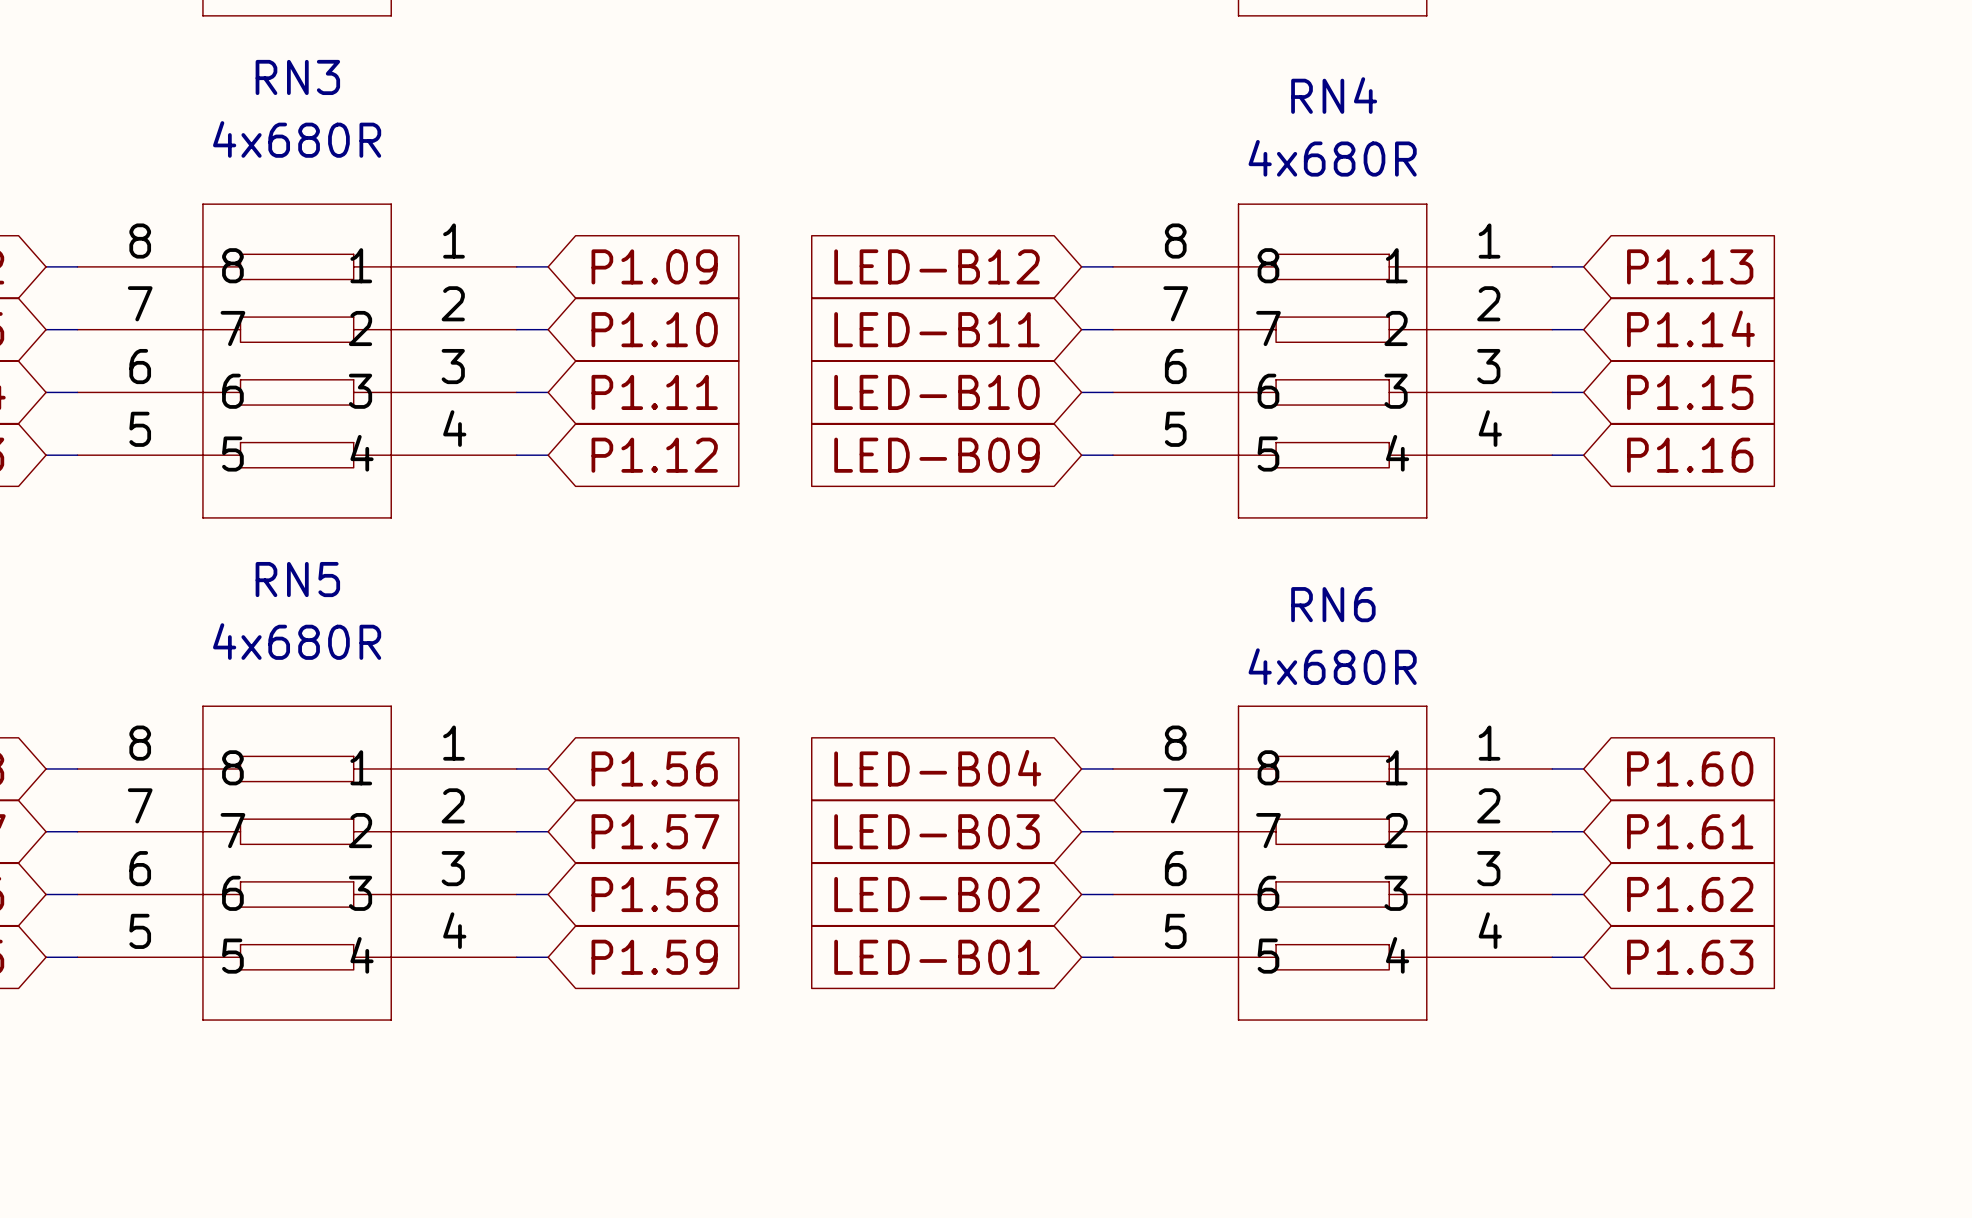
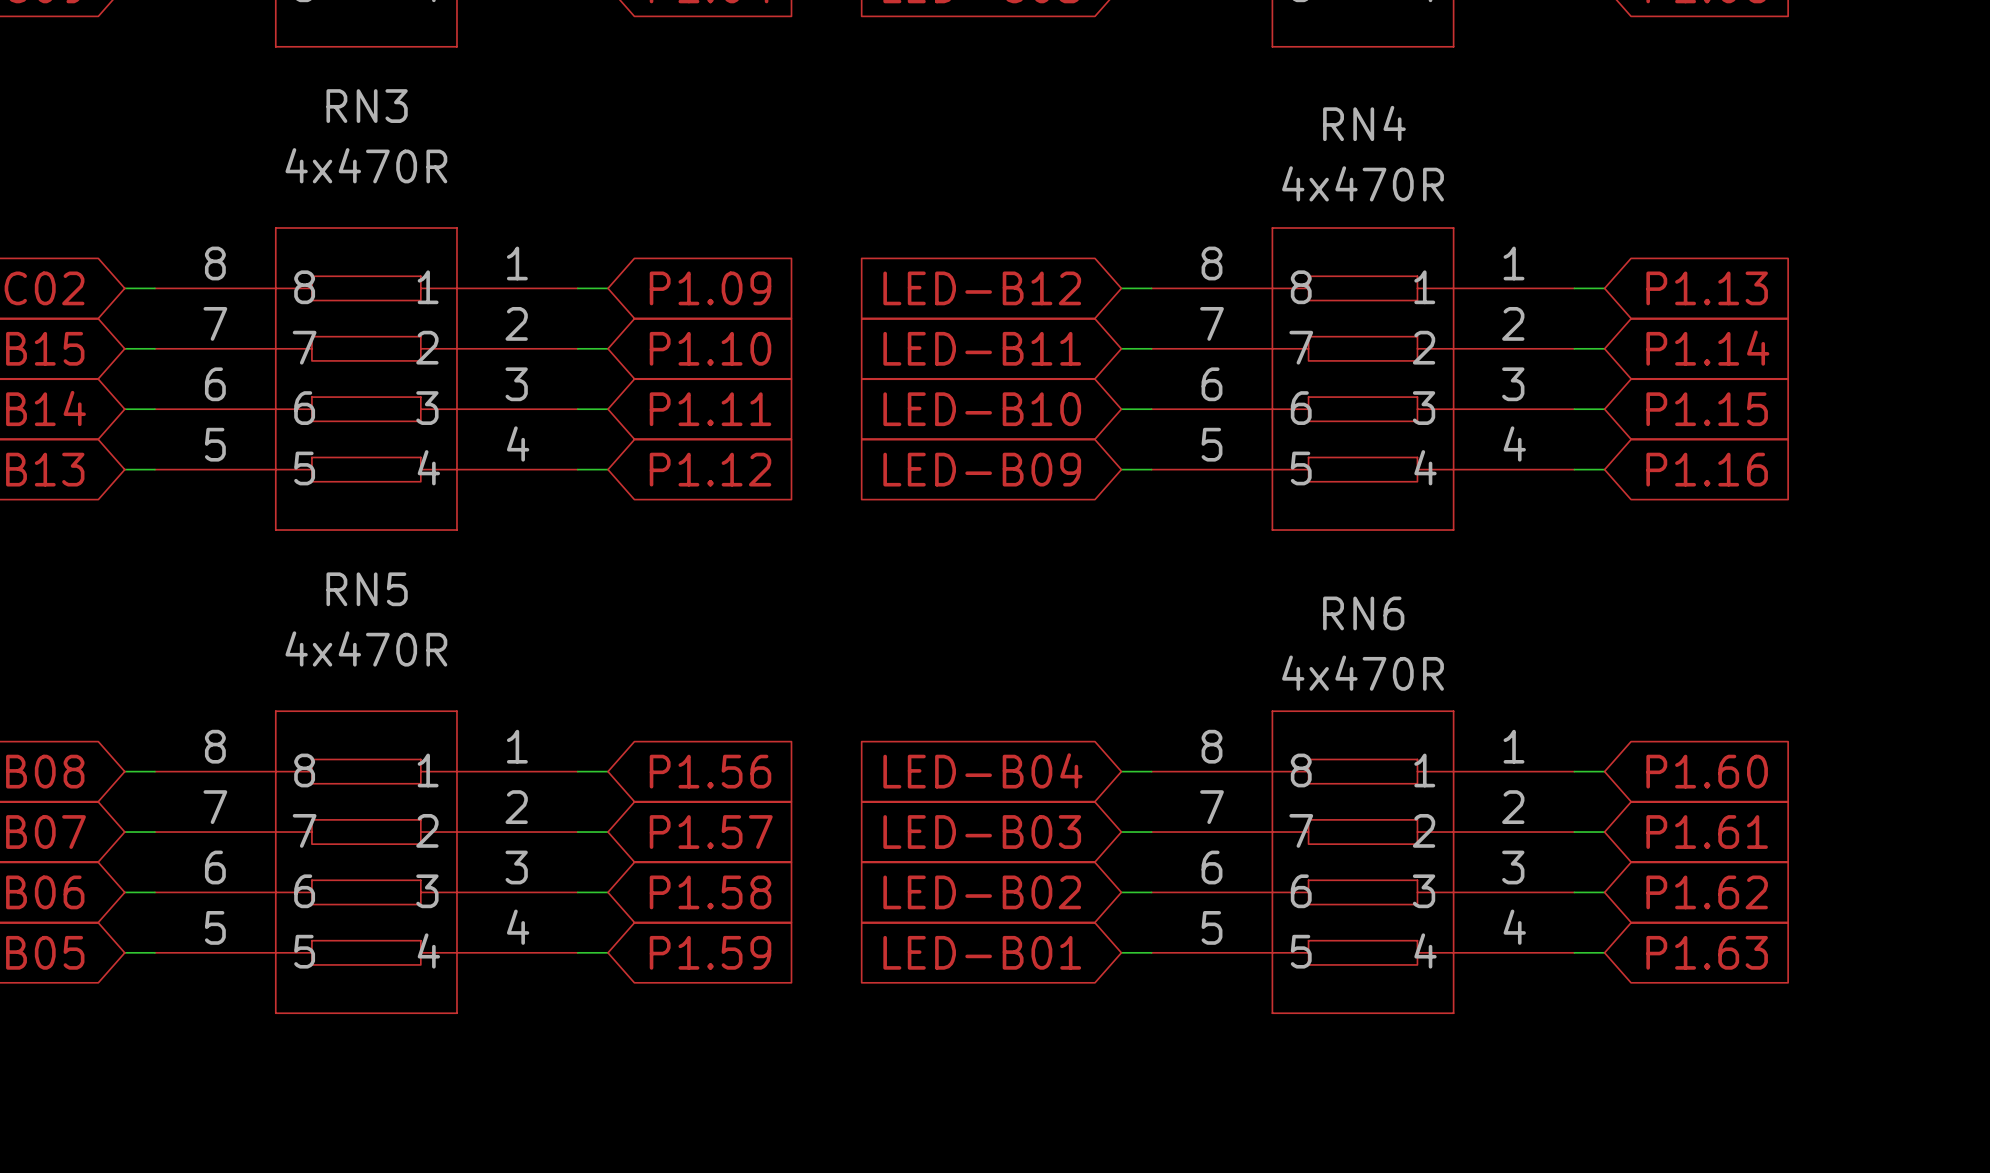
RN3 value: 4x680R (297, 139) -> 4x470R (366, 165)
RN4 value: 4x680R (1332, 158) -> 4x470R (1363, 183)
RN5 value: 4x680R (297, 641) -> 4x470R (366, 648)
RN6 value: 4x680R (1332, 666) -> 4x470R (1363, 673)

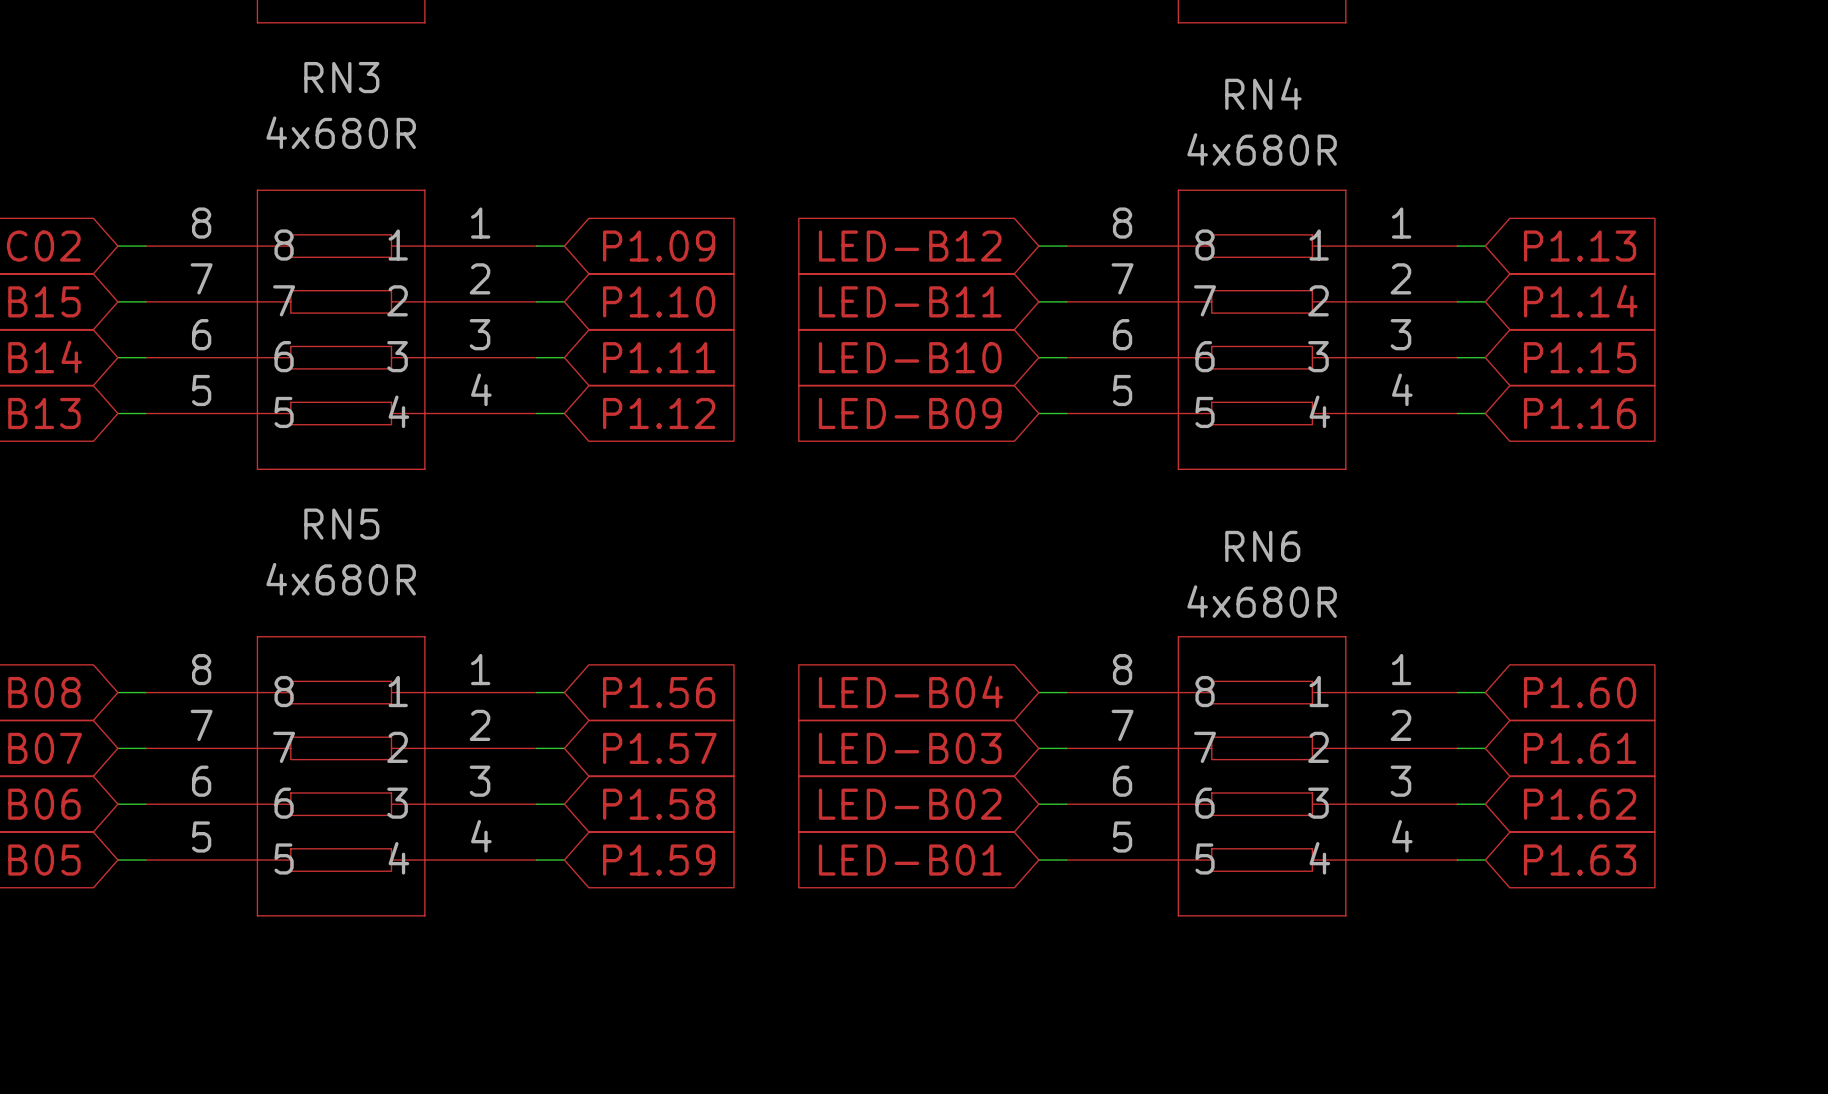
RN3 value: 4x470R (366, 165) -> 4x680R (341, 132)
RN4 value: 4x470R (1363, 183) -> 4x680R (1262, 149)
RN5 value: 4x470R (366, 648) -> 4x680R (341, 579)
RN6 value: 4x470R (1363, 673) -> 4x680R (1262, 601)

